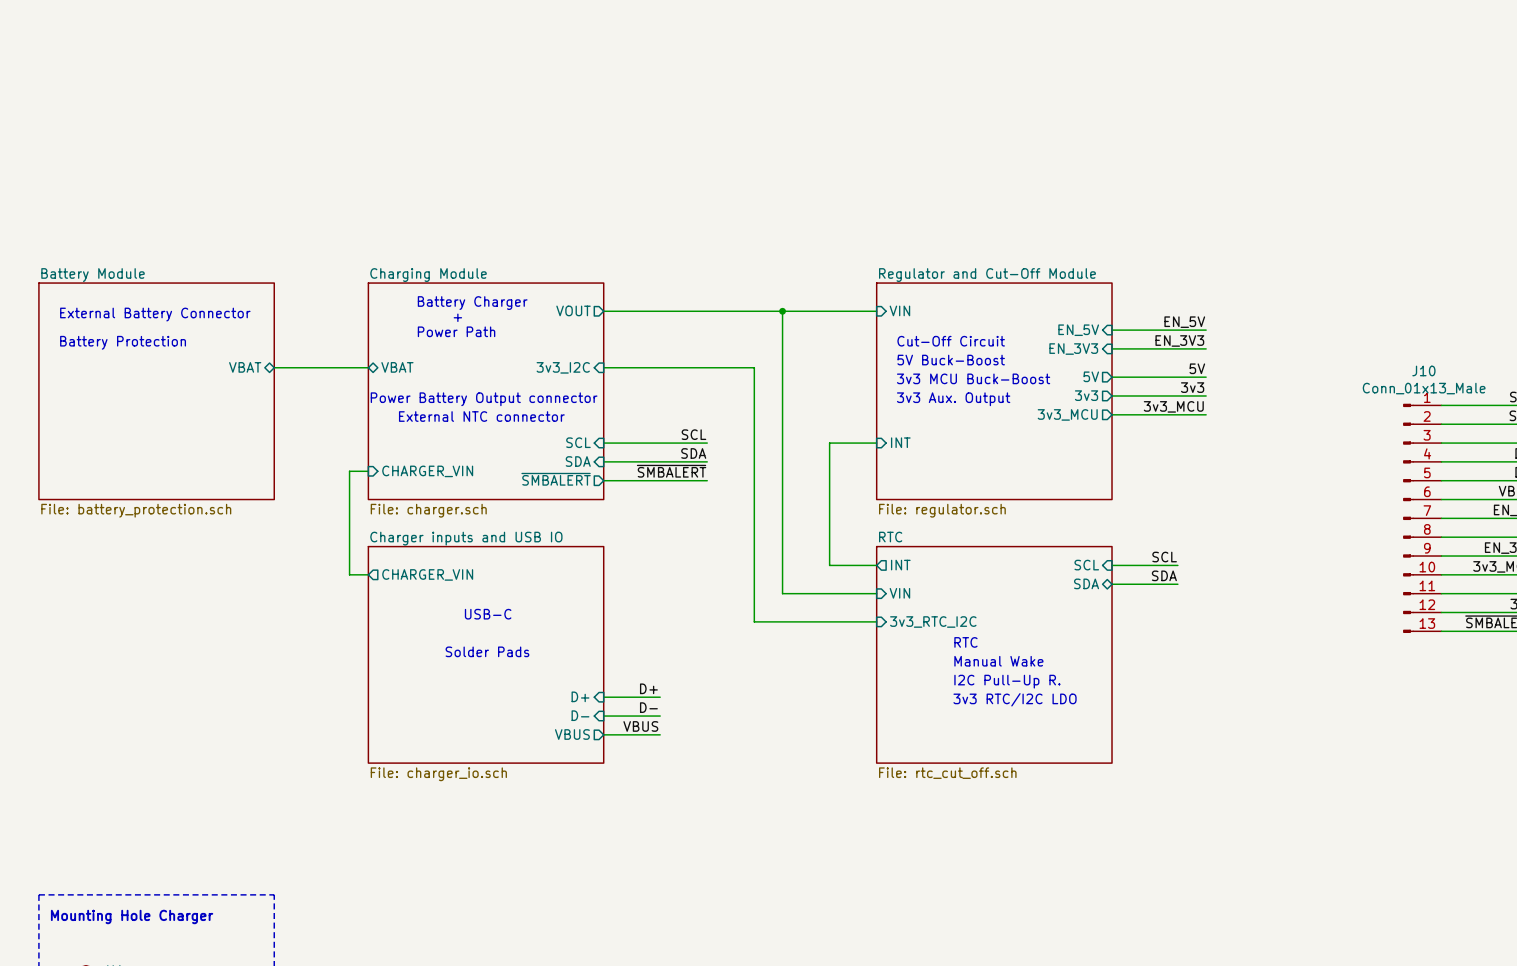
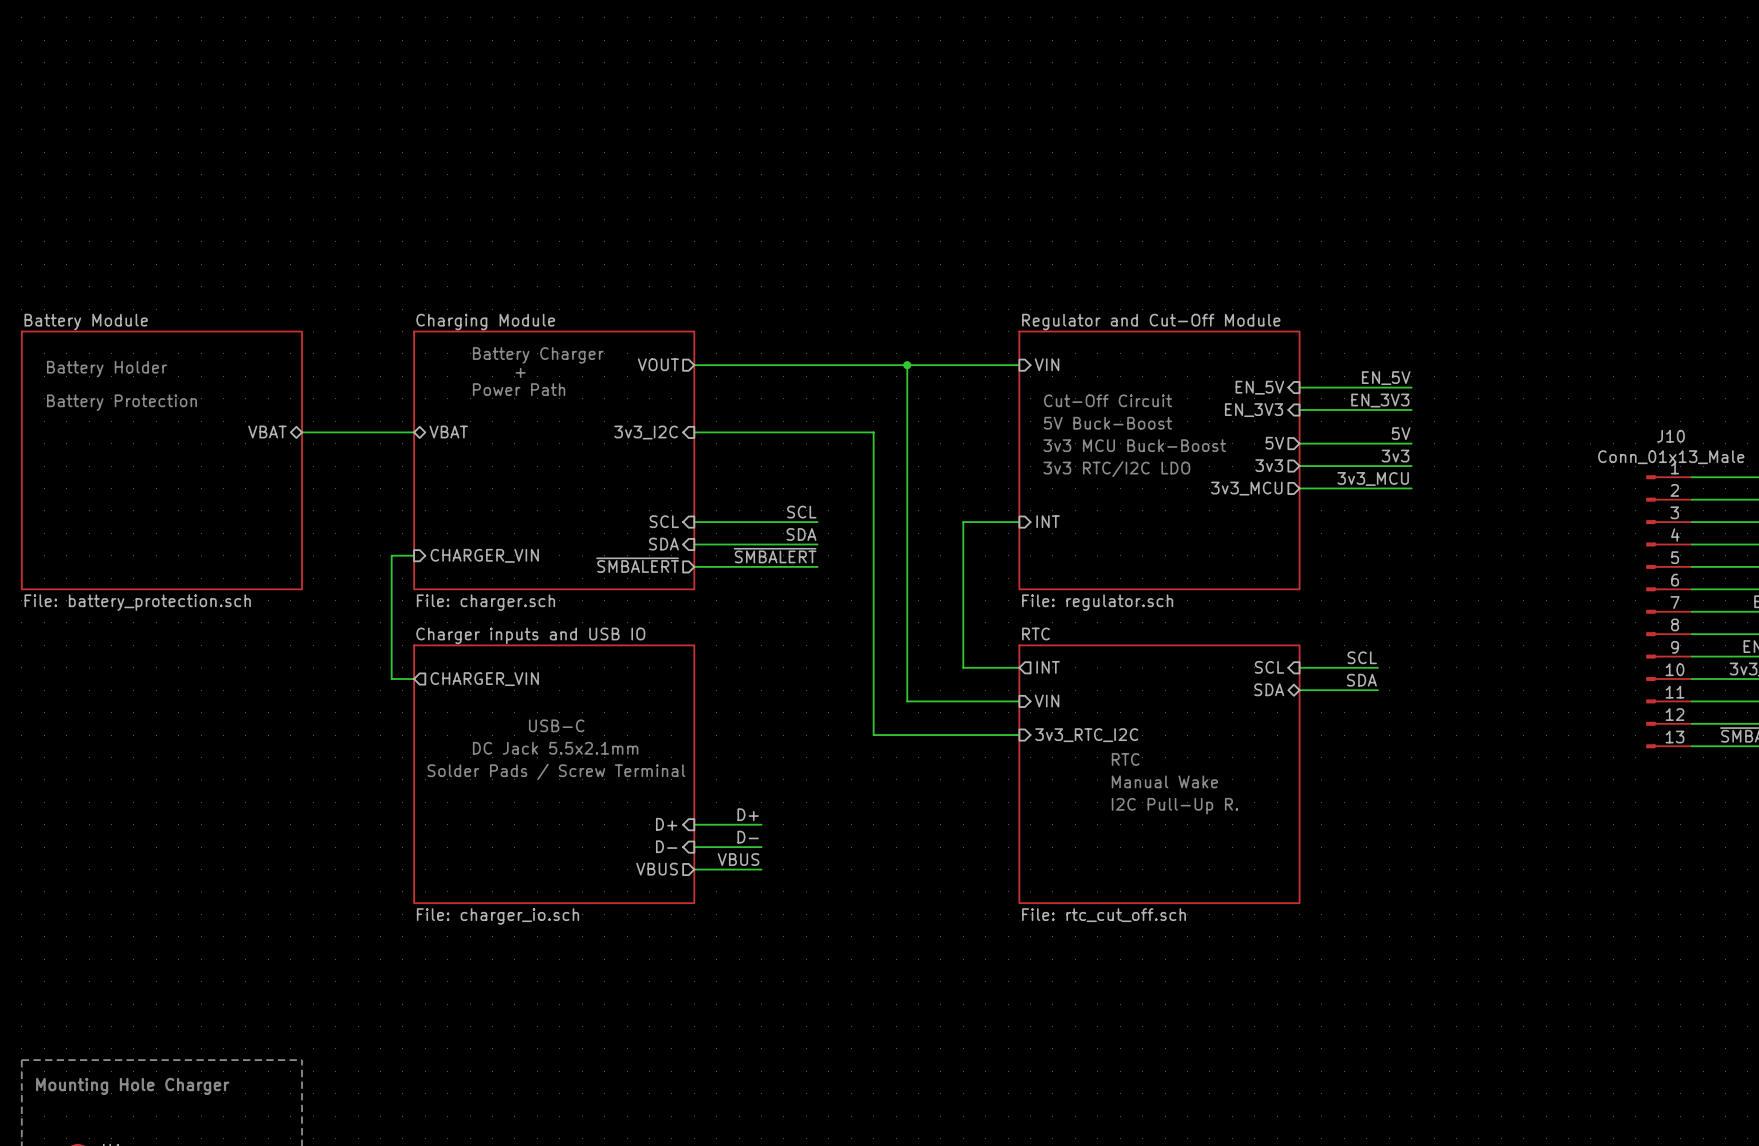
text: External Battery Connector (155, 314) -> Battery Holder (107, 369)
text: Power Battery Output connector (484, 399) -> none
text: 3v3 Aux. Output (953, 399) -> 3v3 RTC/I2C LDO (1116, 469)
text: External NTC connector (481, 416) -> none
text: none -> DC Jack 5.5x2.1mm (555, 748)
text: Solder Pads (487, 651) -> none
text: none -> Solder Pads / Screw Terminal (556, 771)
text: 3v3 RTC/I2C LDO (1015, 699) -> none

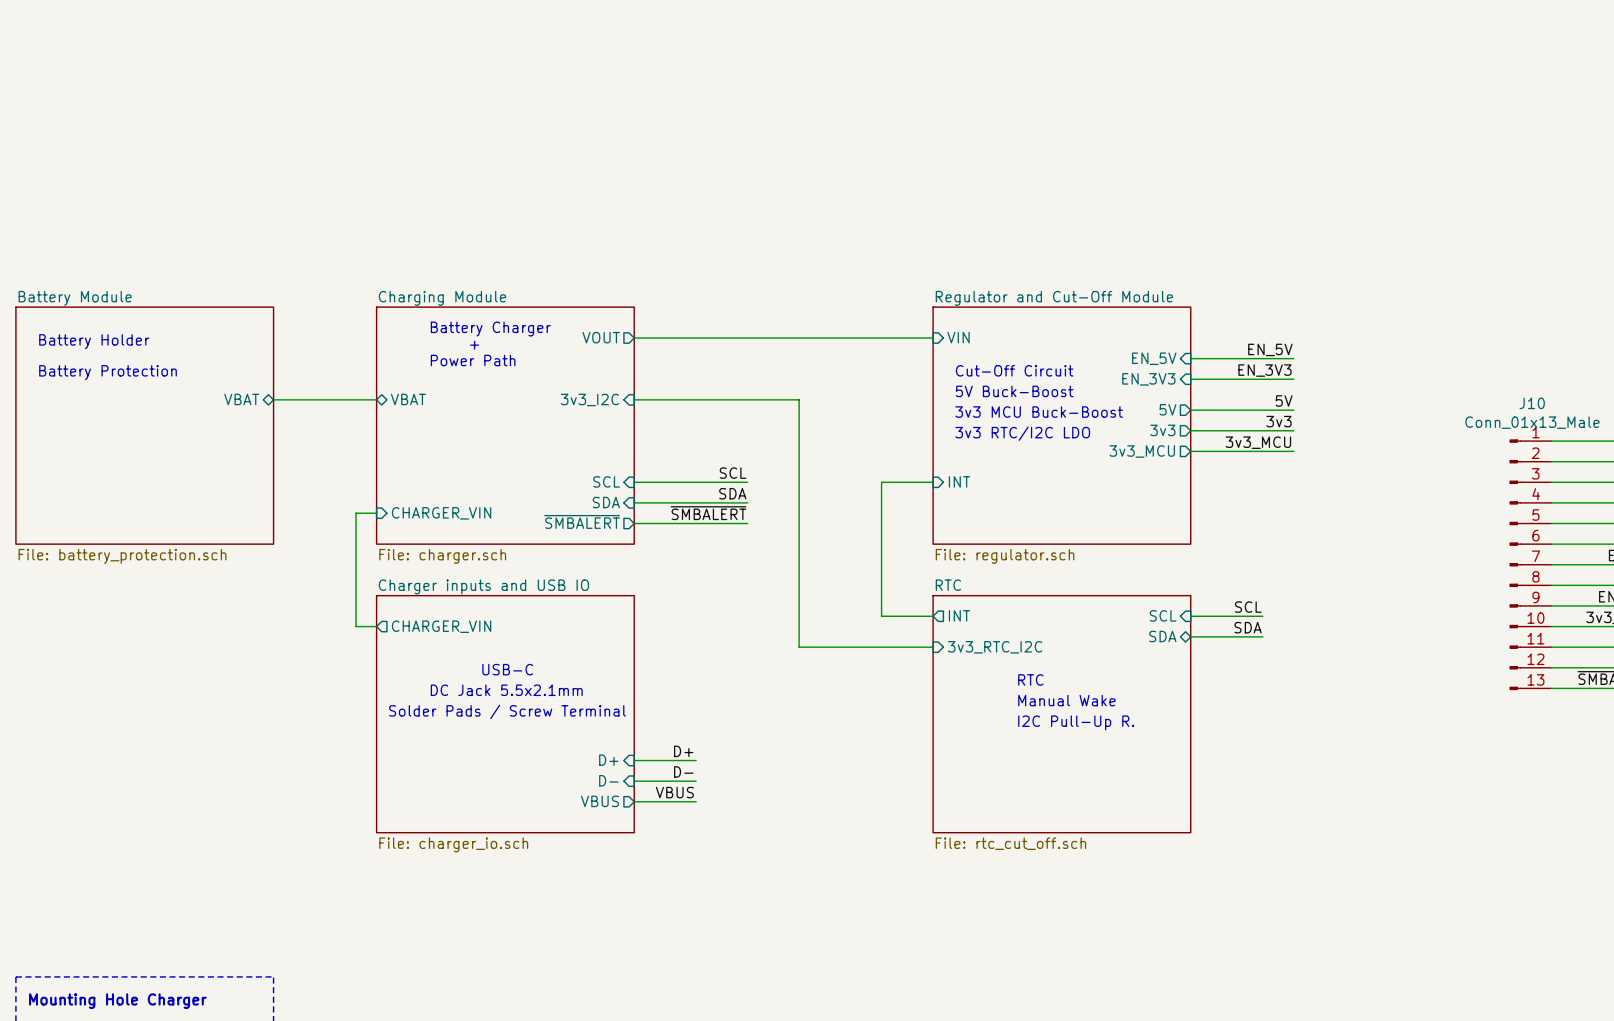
wire: (907, 365) (907, 701) -> none
junction: (907, 365) -> none
wire: (873, 701) (873, 735) (1019, 735) -> (799, 647) (830, 647)
sheet pin: VIN (1047, 701) -> 3v3_RTC_I2C (995, 647)
sheet pin: 3v3_RTC_I2C (1086, 735) -> none
text: none -> RTC (1030, 679)
text: RTC (1125, 759) -> Manual Wake (1066, 700)
text: Manual Wake (1164, 781) -> I2C Pull-Up R. (1076, 722)
text: I2C Pull-Up R. (1175, 806) -> none

